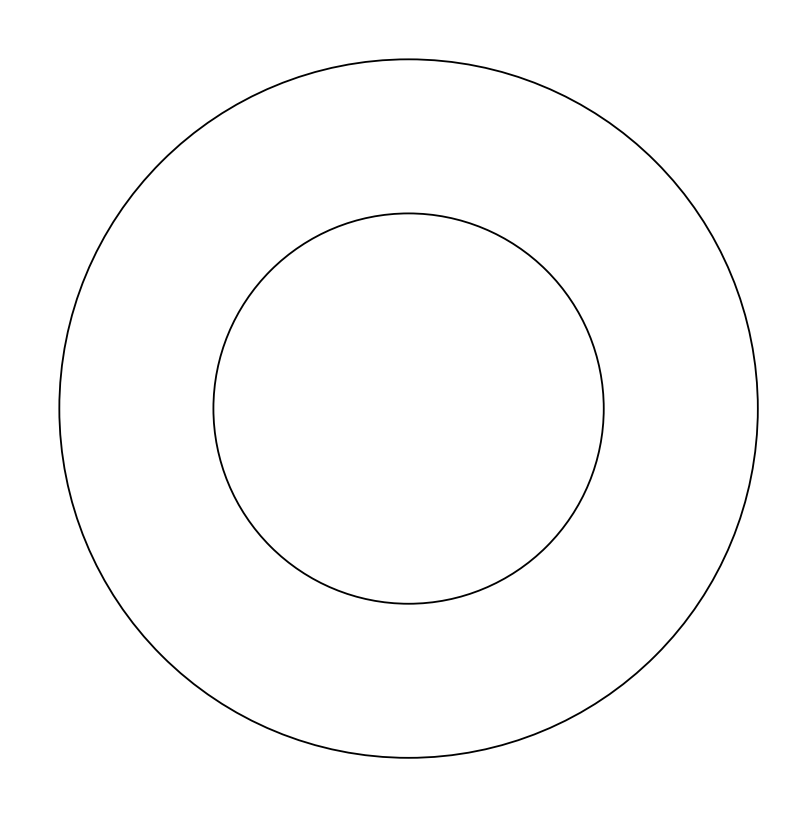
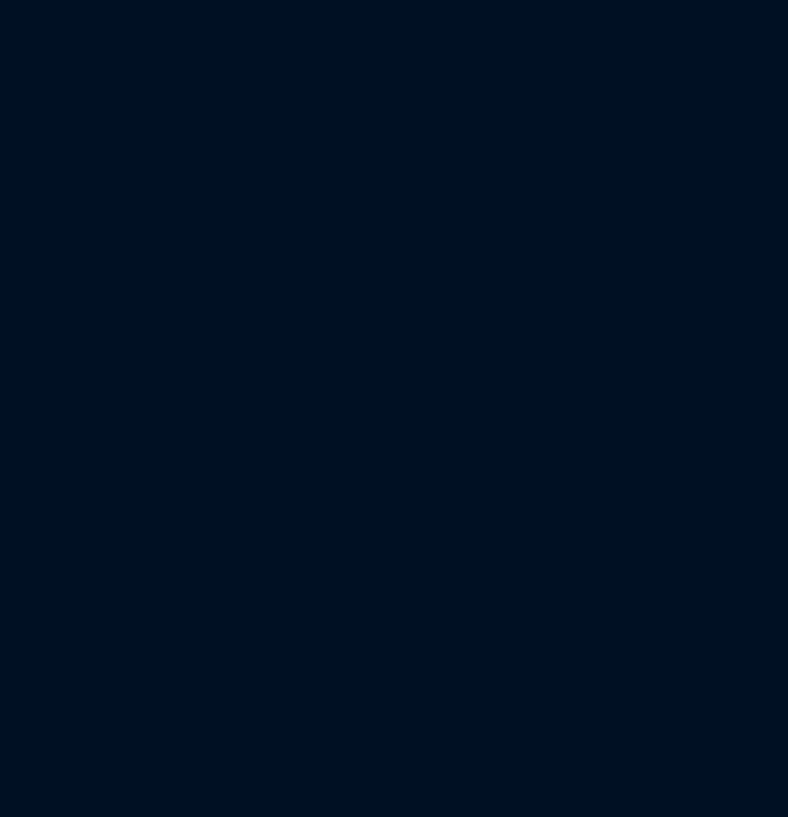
round board edge: [59, 59, 759, 759] -> none
round board edge: [213, 213, 605, 605] -> none

